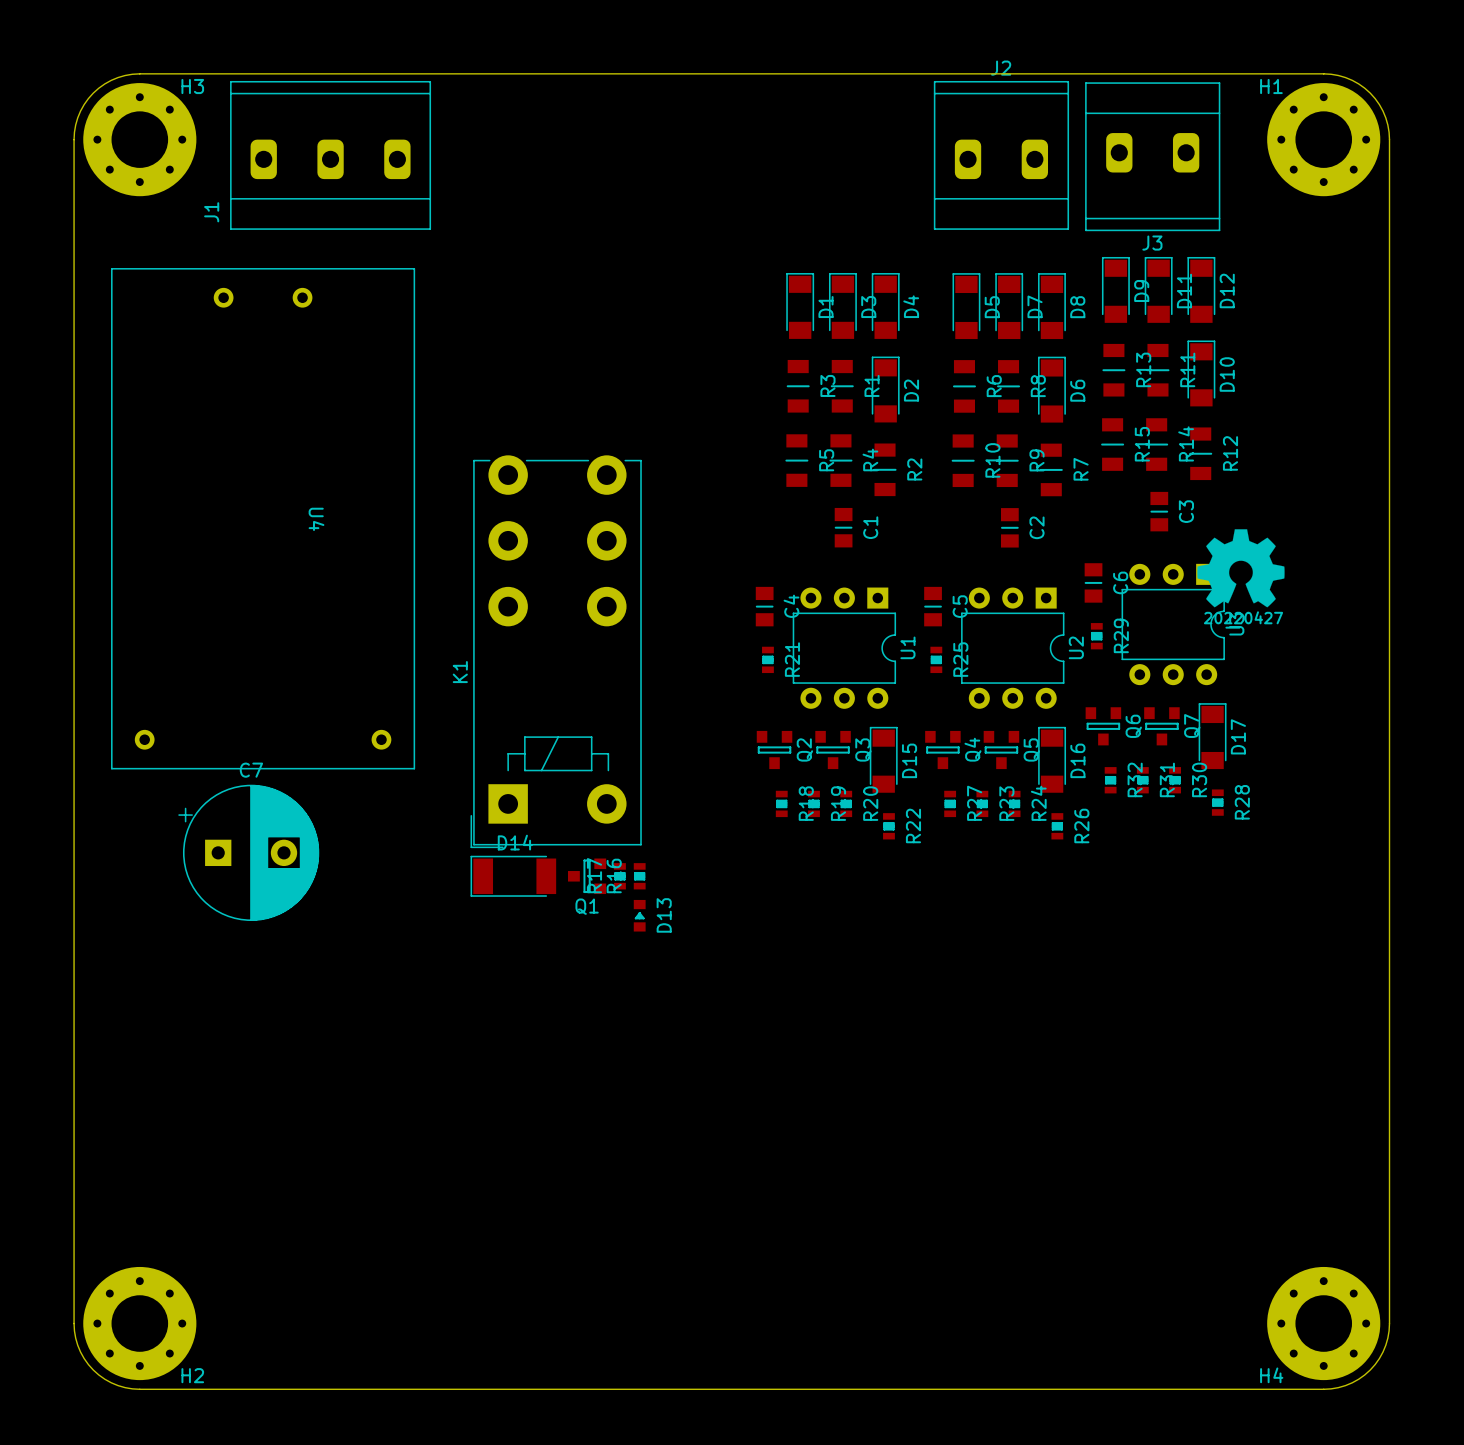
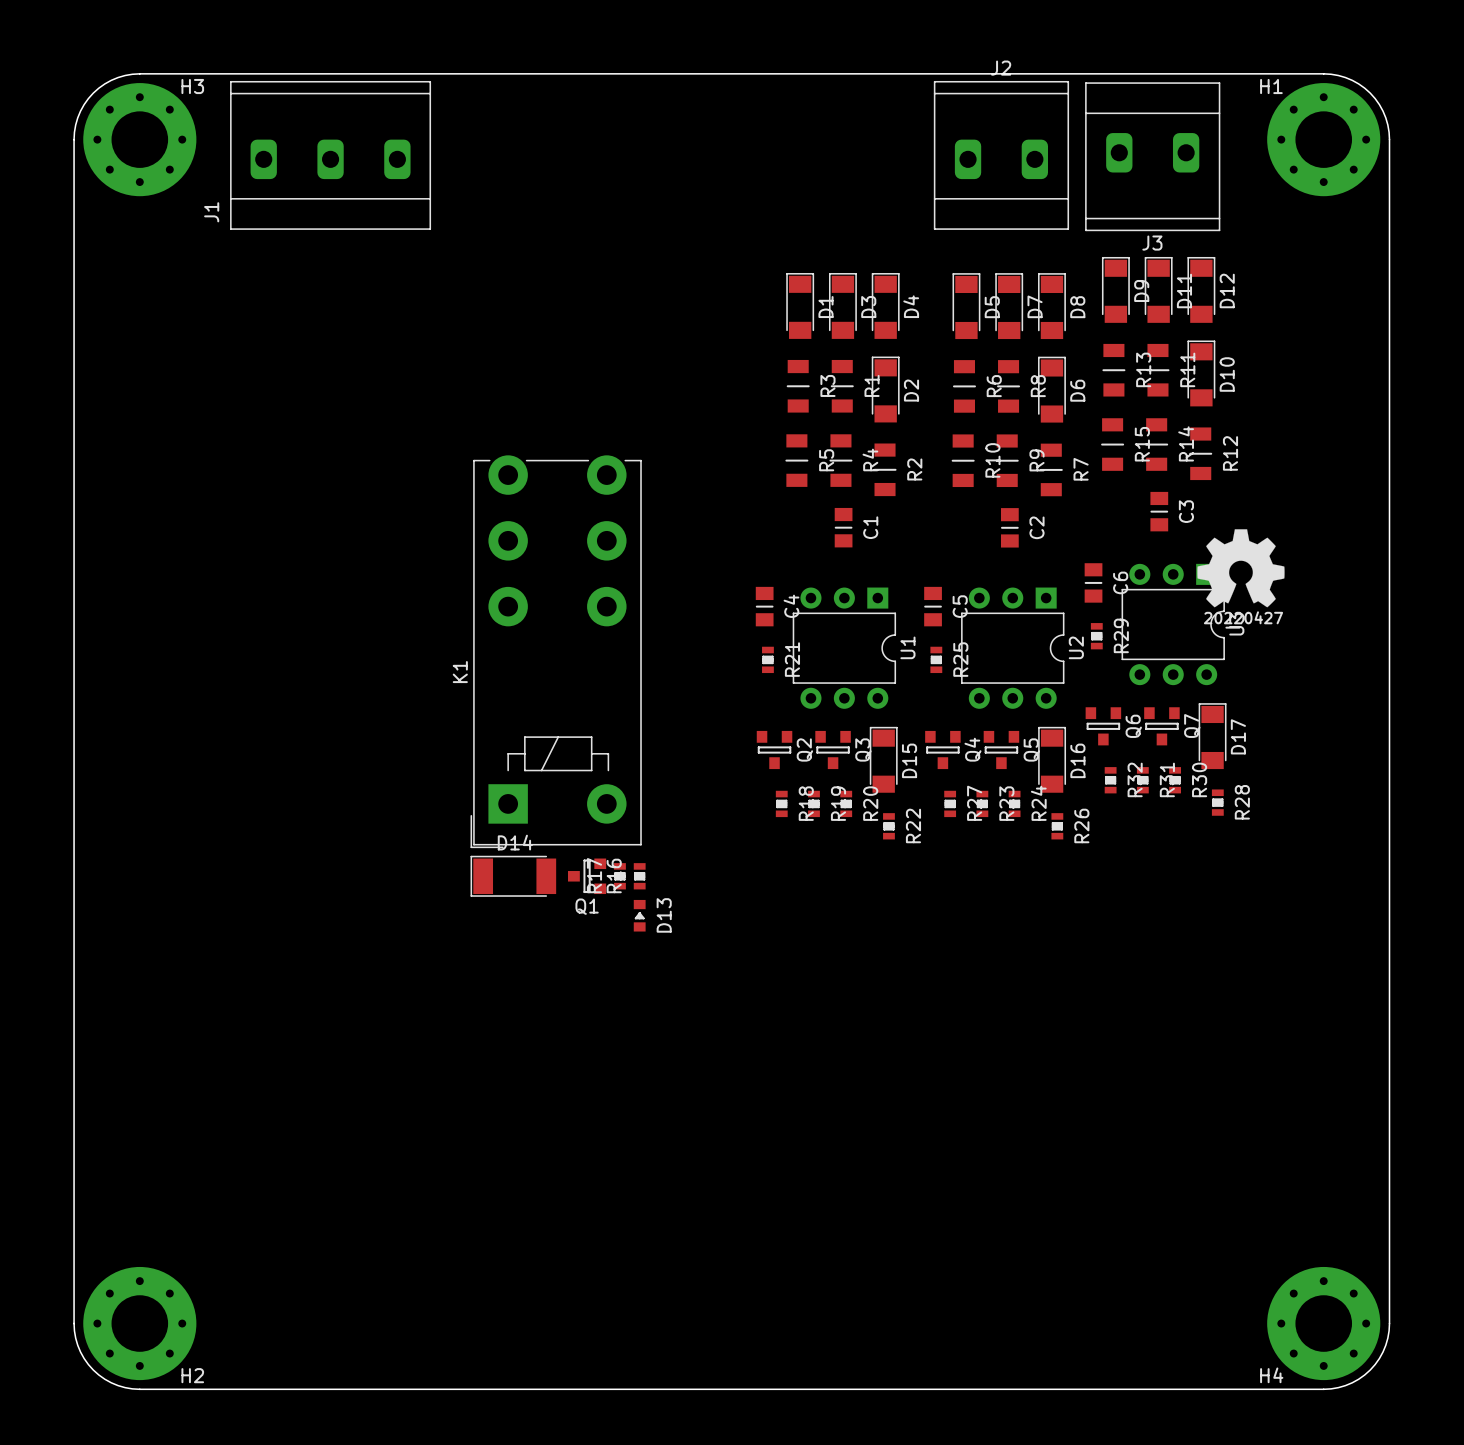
U4: (263, 518) -> none
C7: (248, 852) -> none

